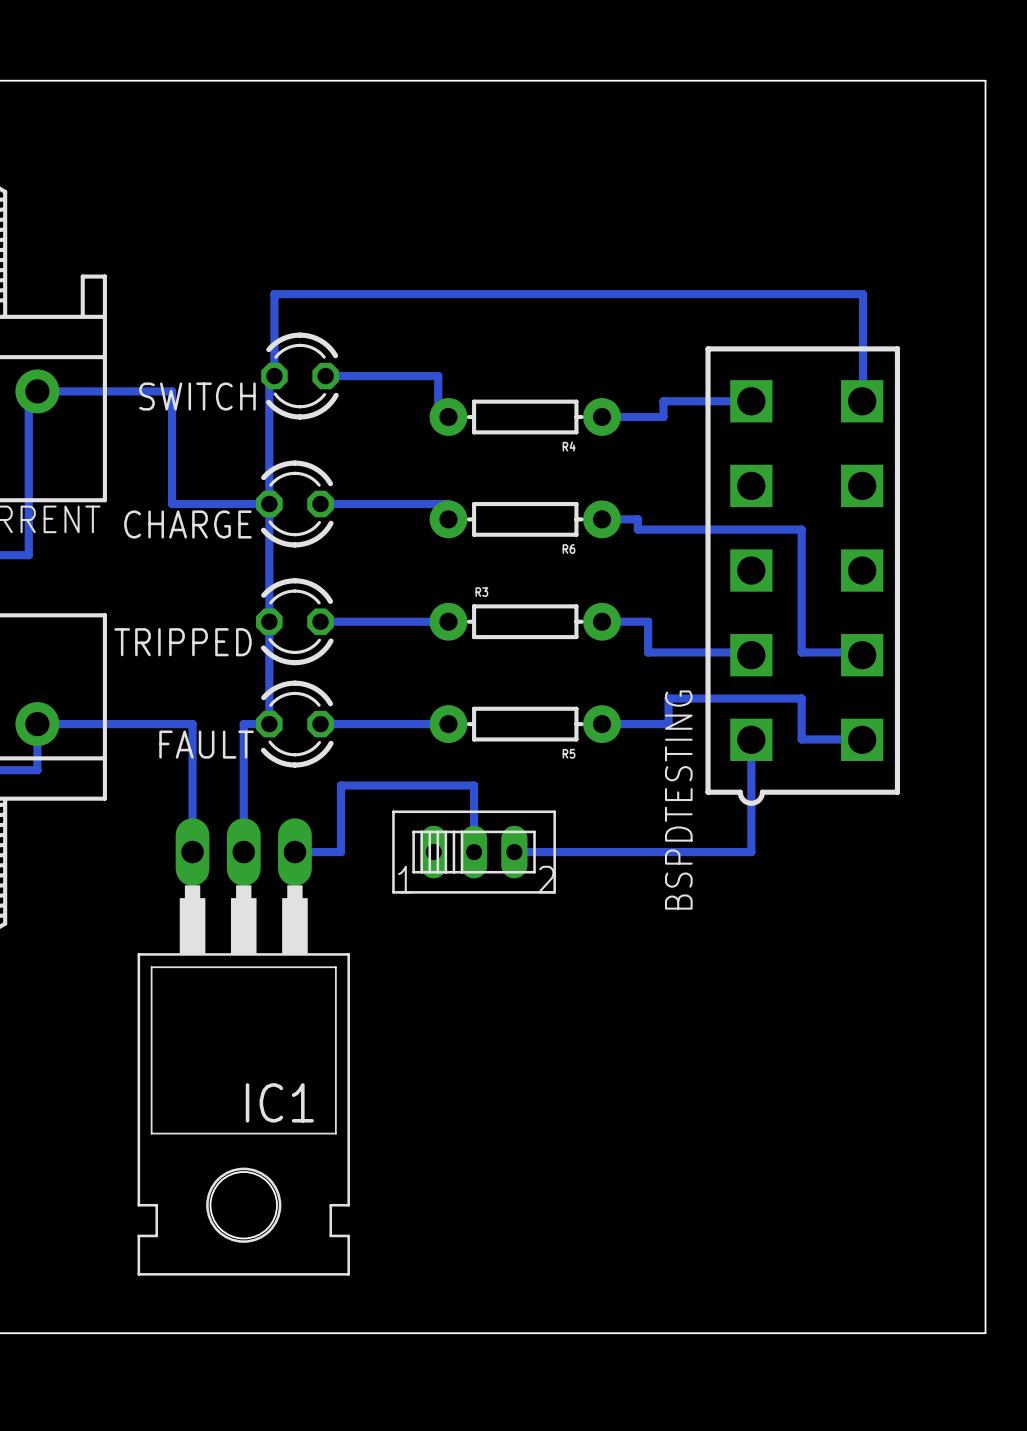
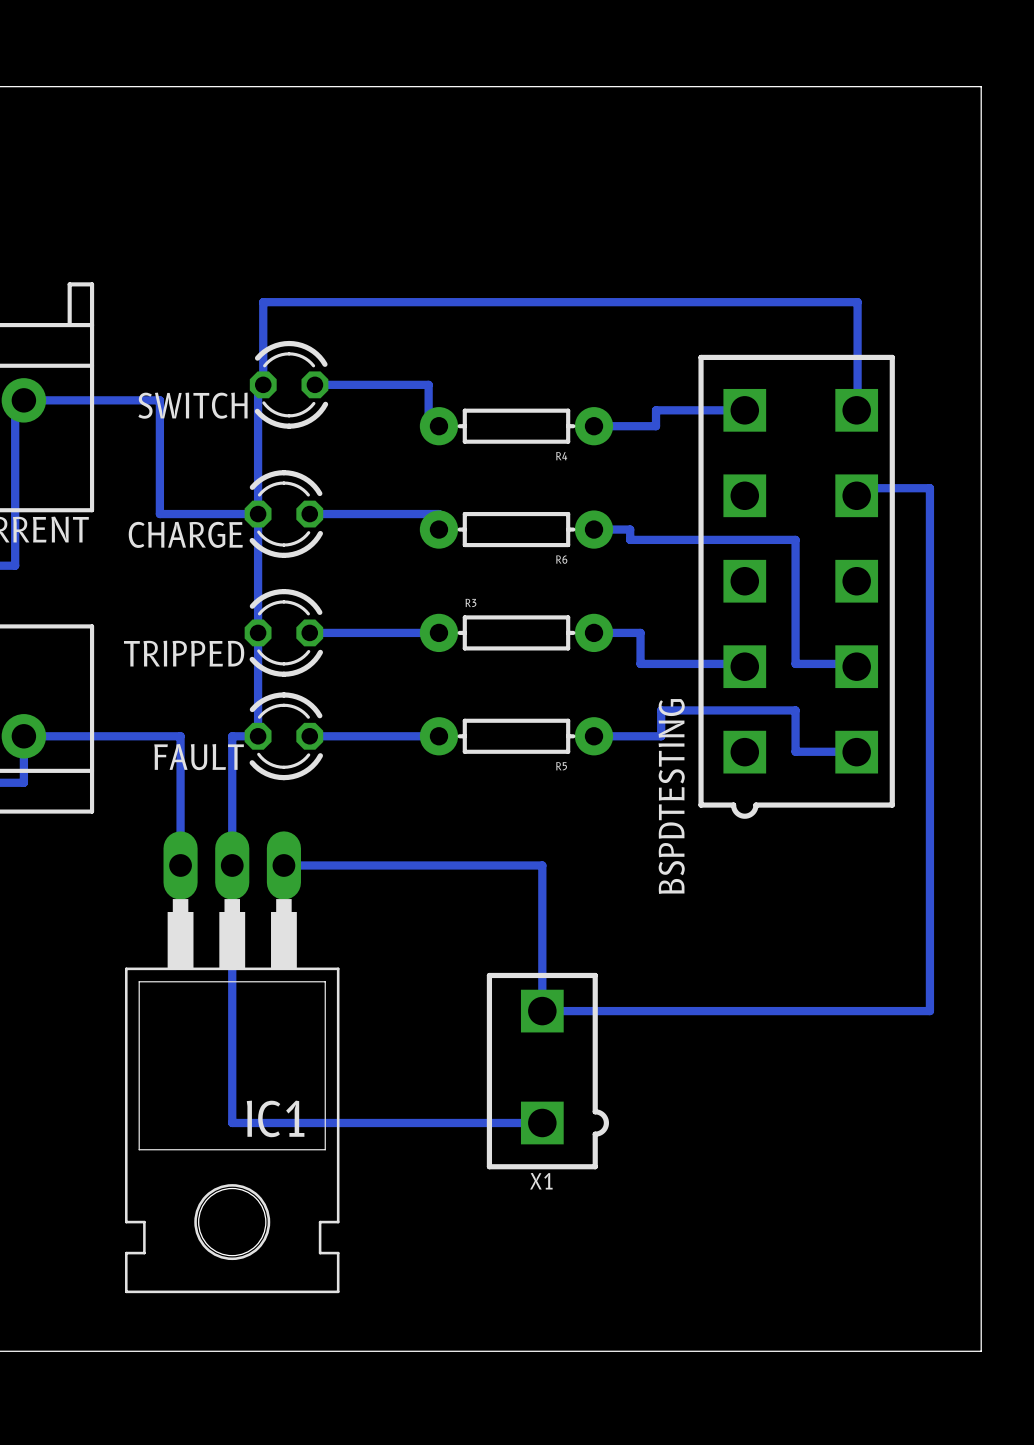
bottom track: (751, 739) (751, 852) (550, 852) -> (856, 495) (856, 488) (929, 488) (929, 1011) (542, 1011) (542, 865)
bottom track: none -> (232, 865) (232, 1122) (542, 1122)
bottom track: (341, 852) (341, 785) (474, 785) (474, 852) -> (330, 865) (505, 865)
part: (474, 852) -> none
X1: none -> (547, 1071)

